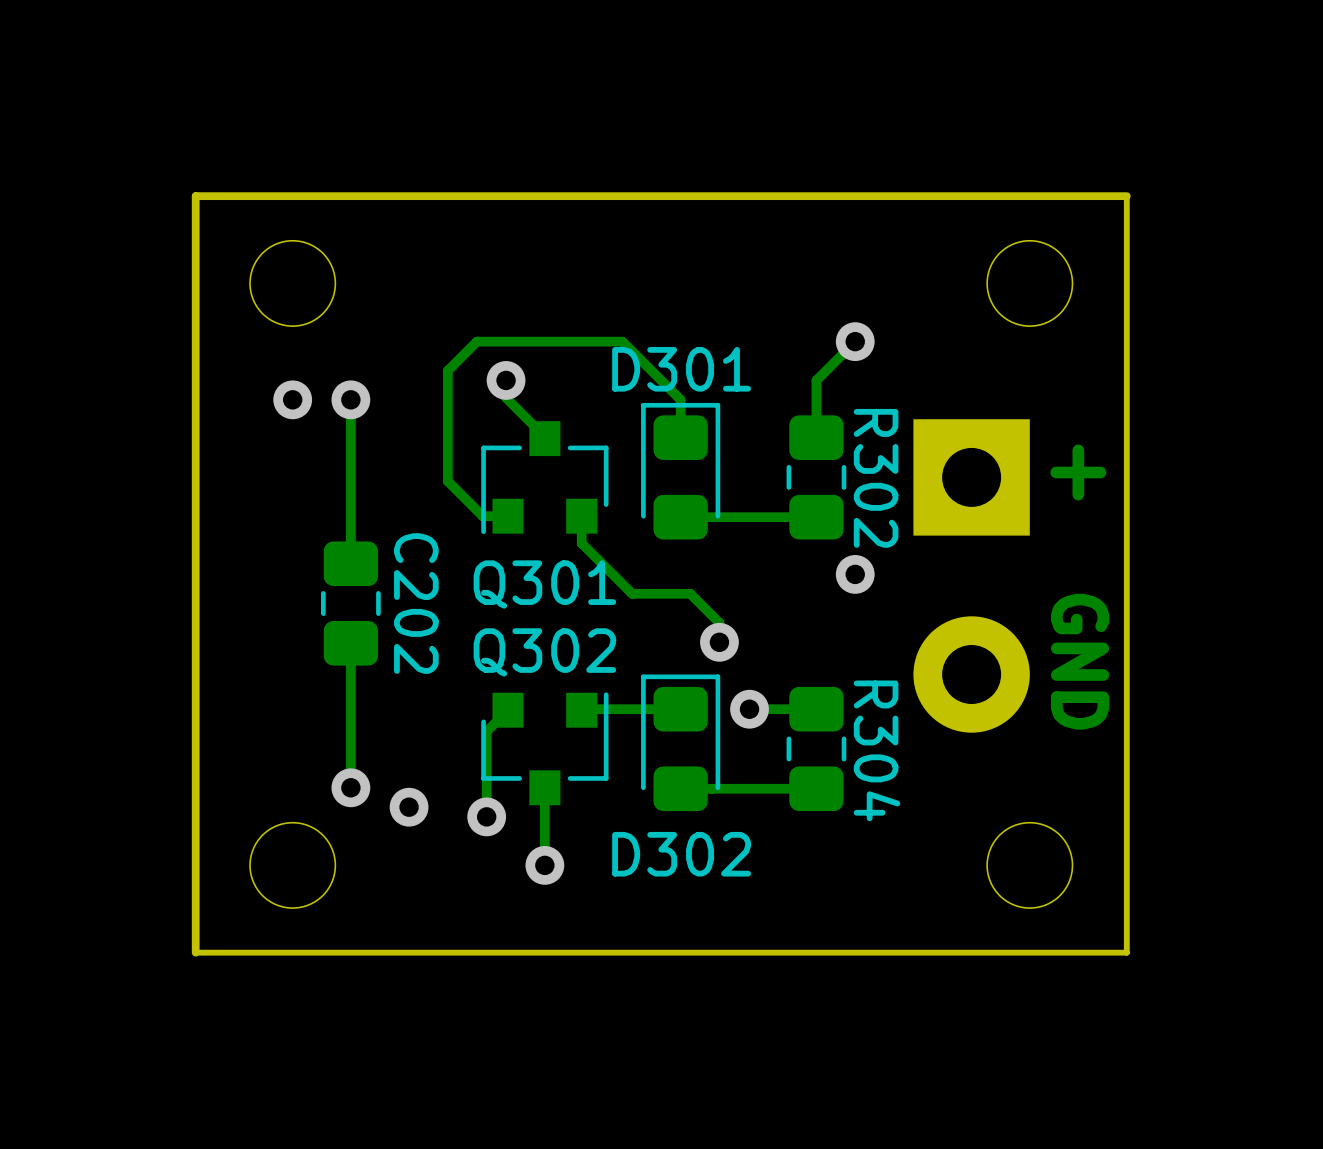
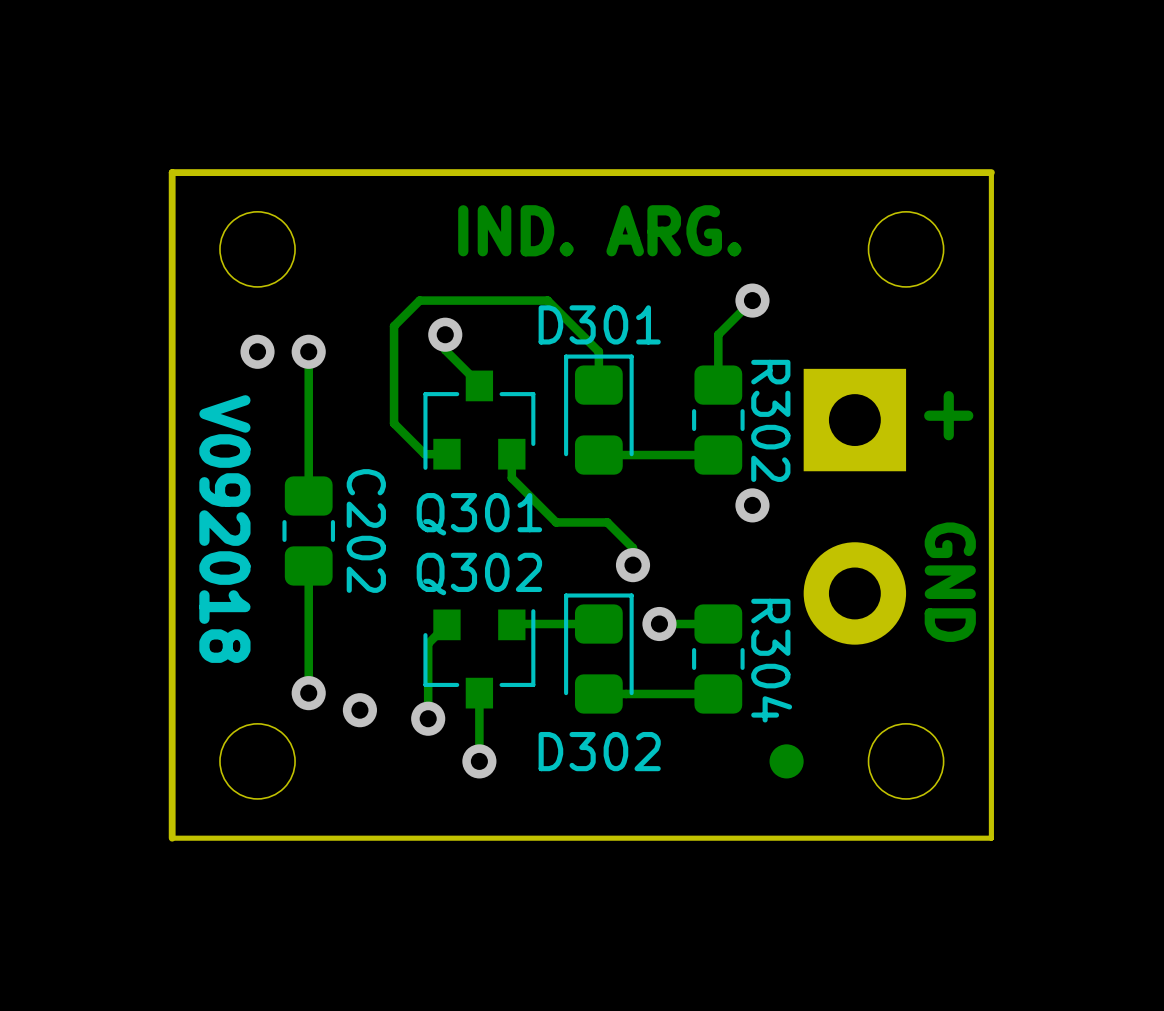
text: none -> IND. ARG. (599, 230)
text: none -> V092018 (224, 529)
part: none -> (786, 761)

